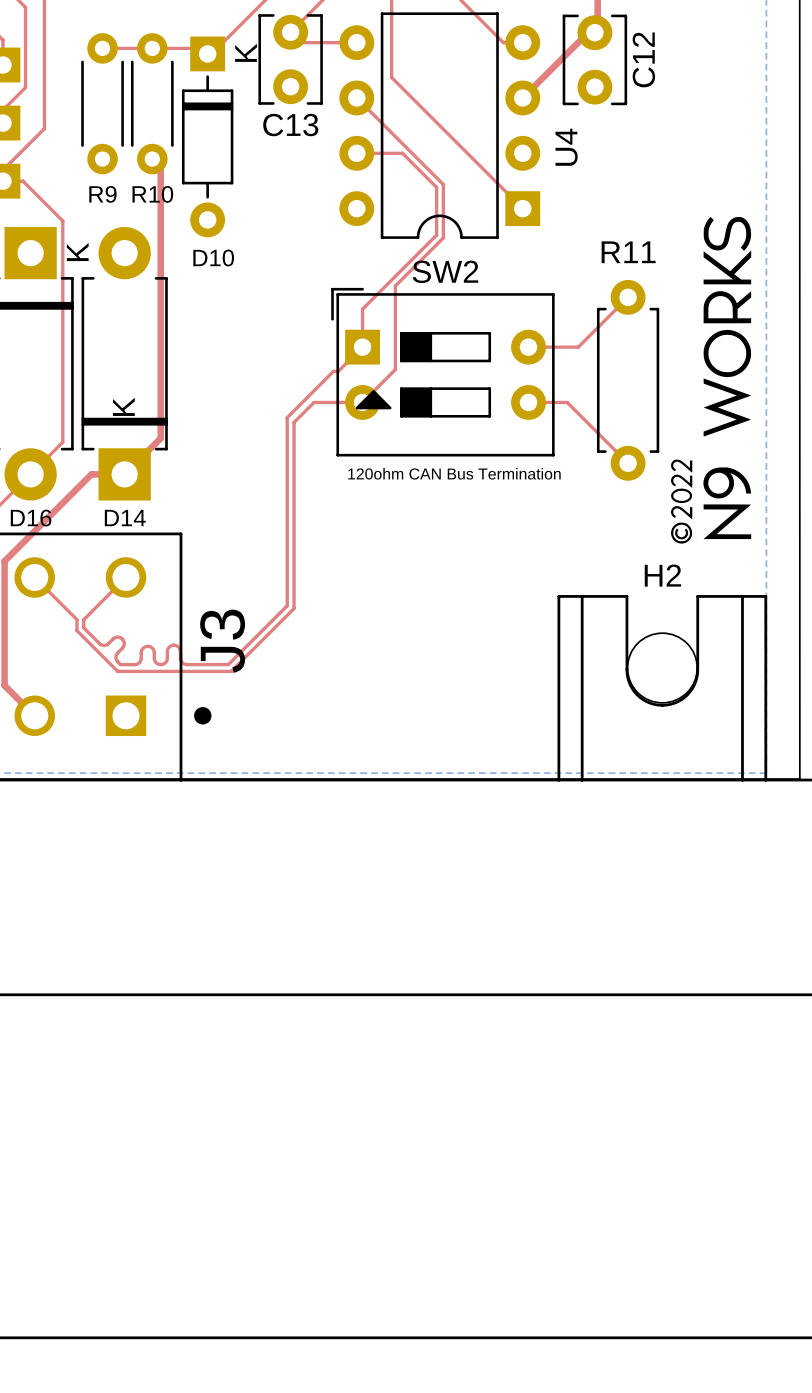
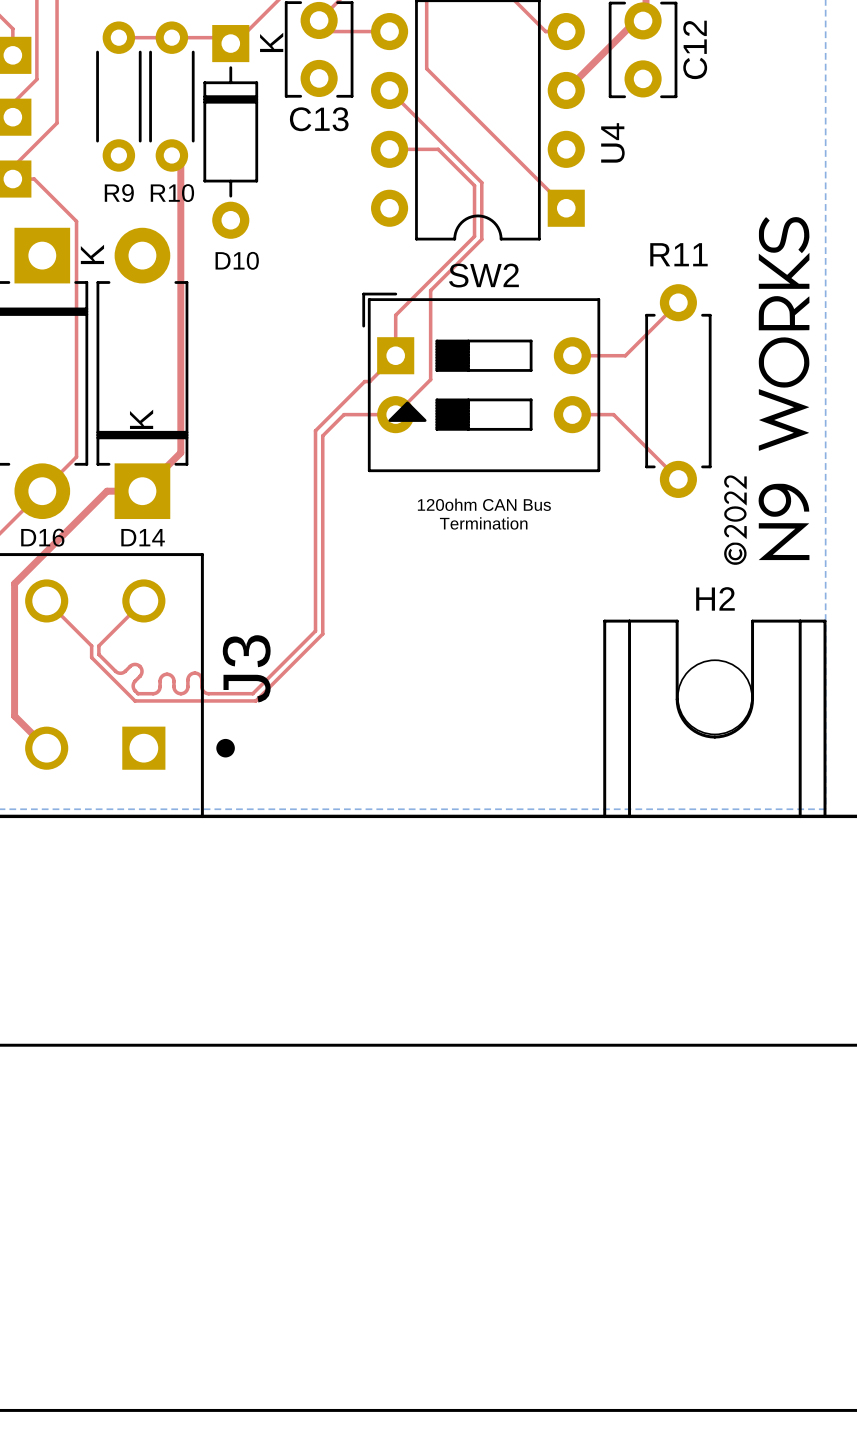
text: 120ohm CAN Bus Termination (454, 473) -> 120ohm CAN Bus (484, 504)
text: none -> Termination (483, 523)

